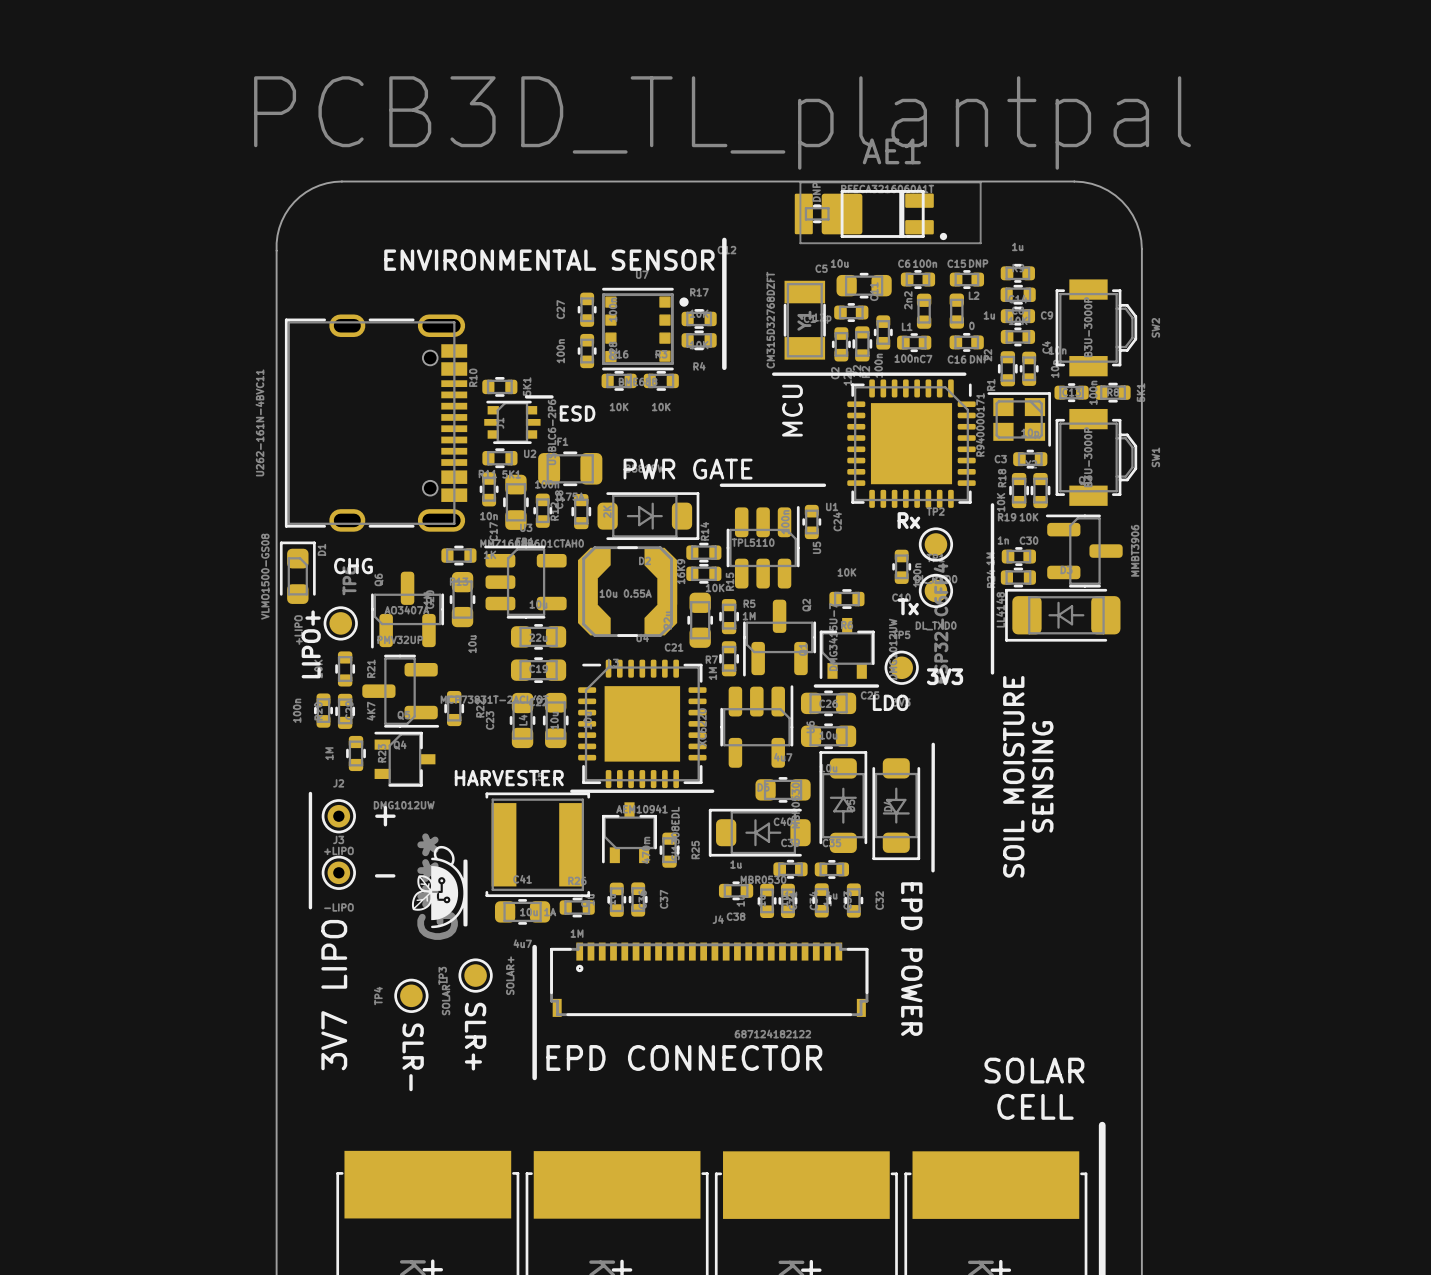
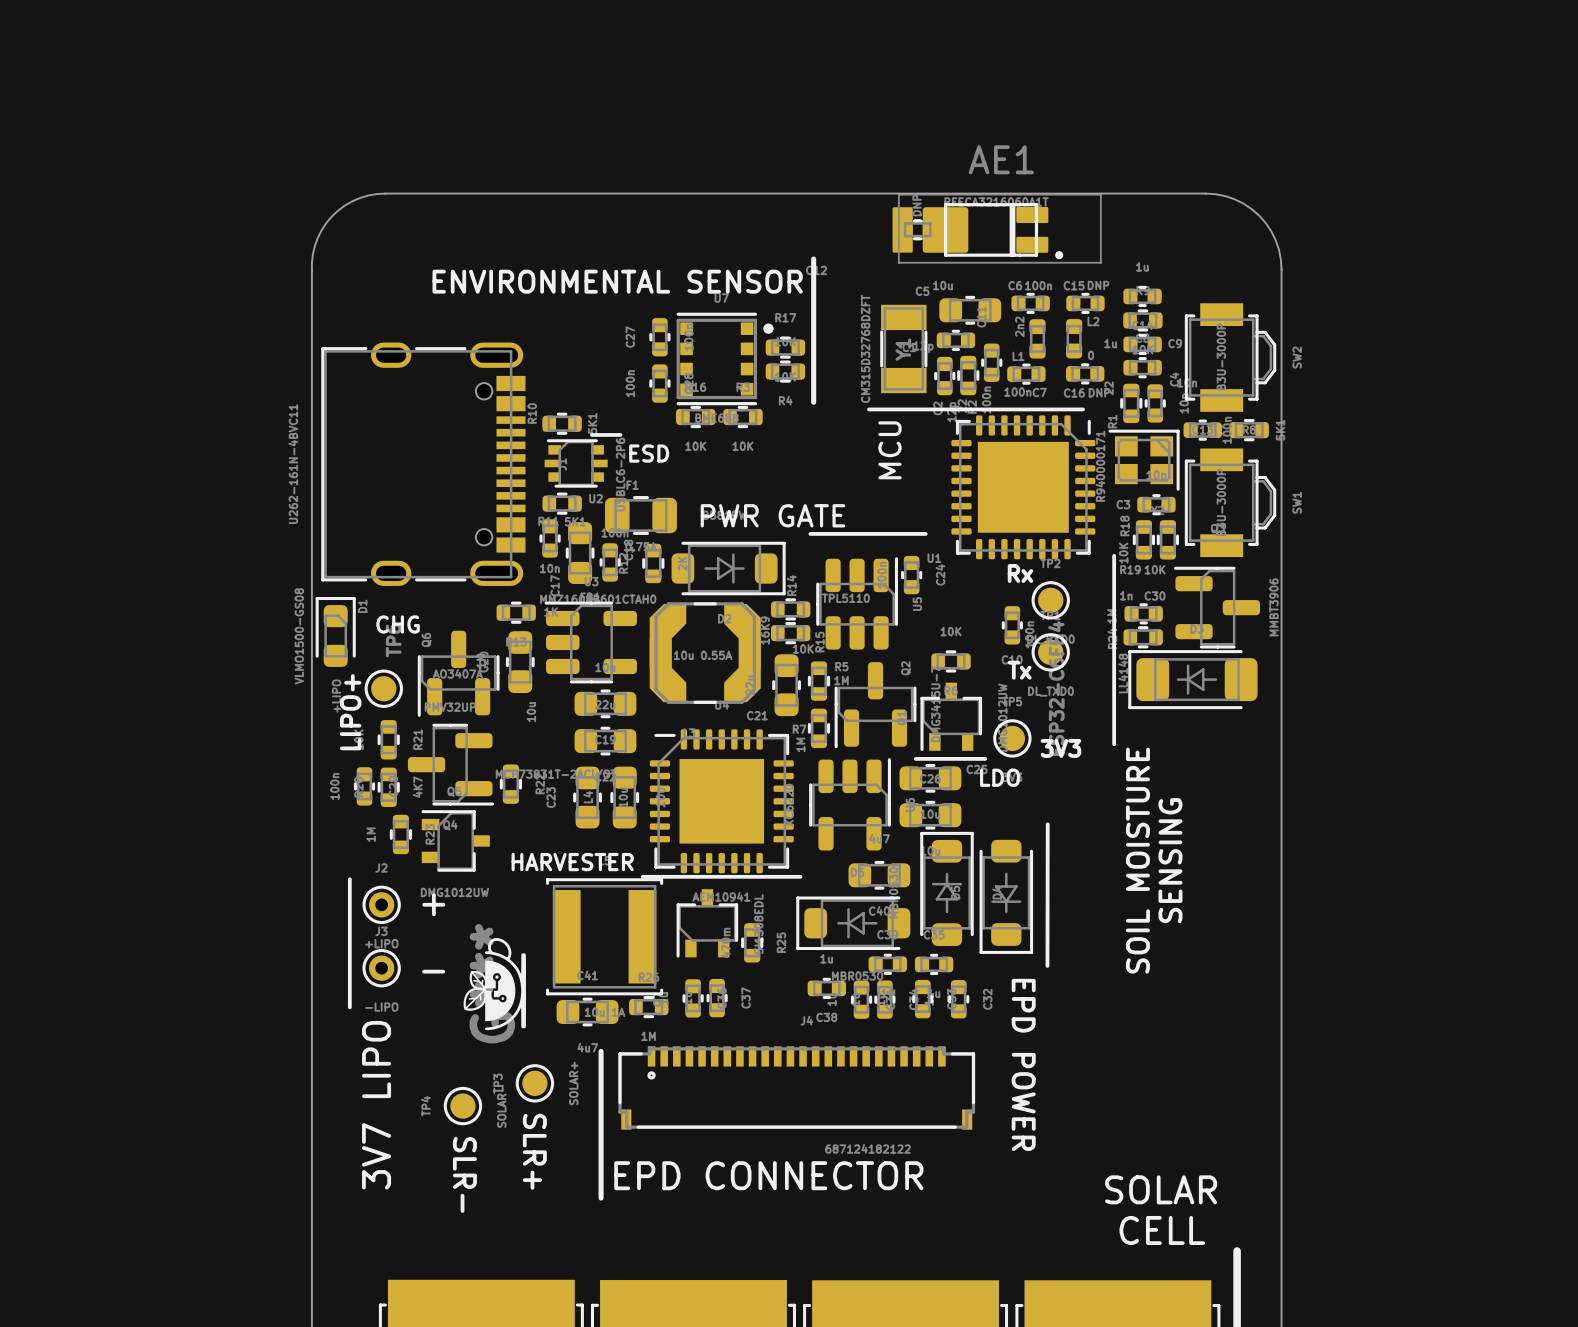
text: PCB3D_TL_plantpal (722, 122) -> none

